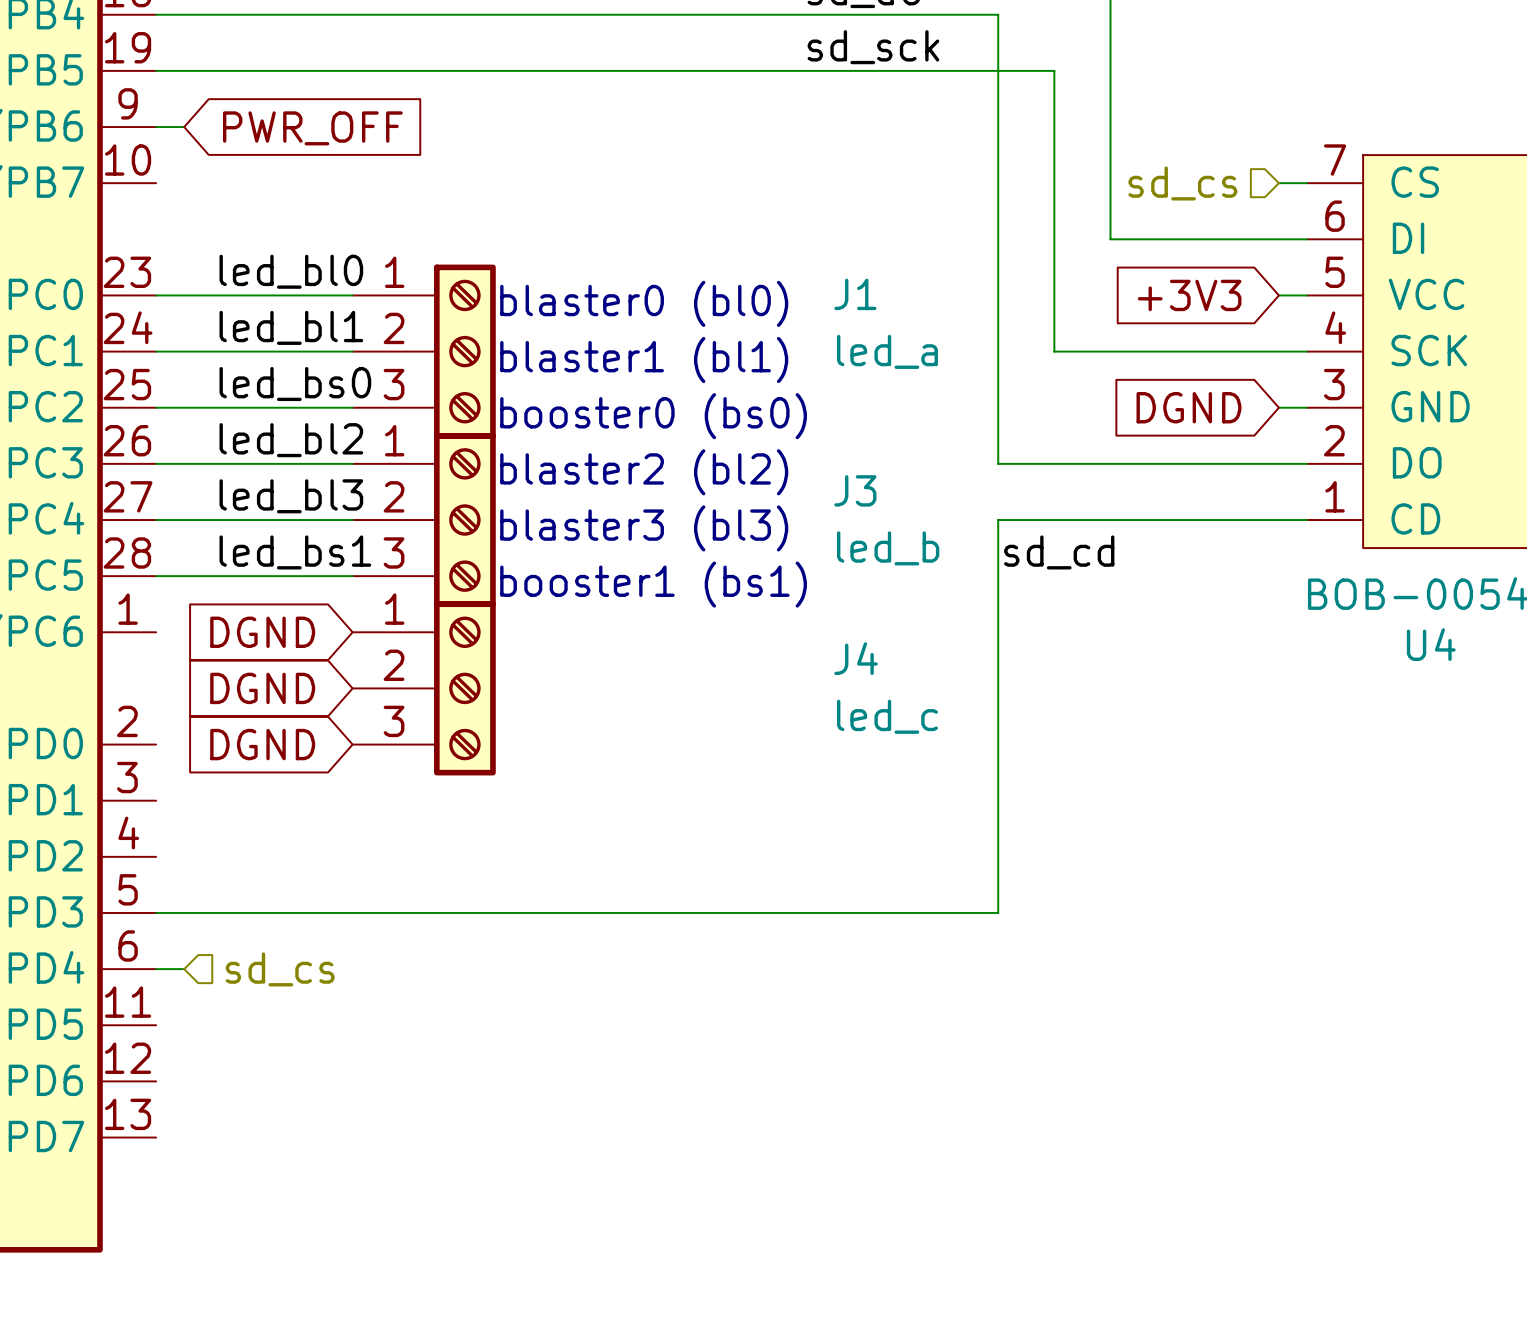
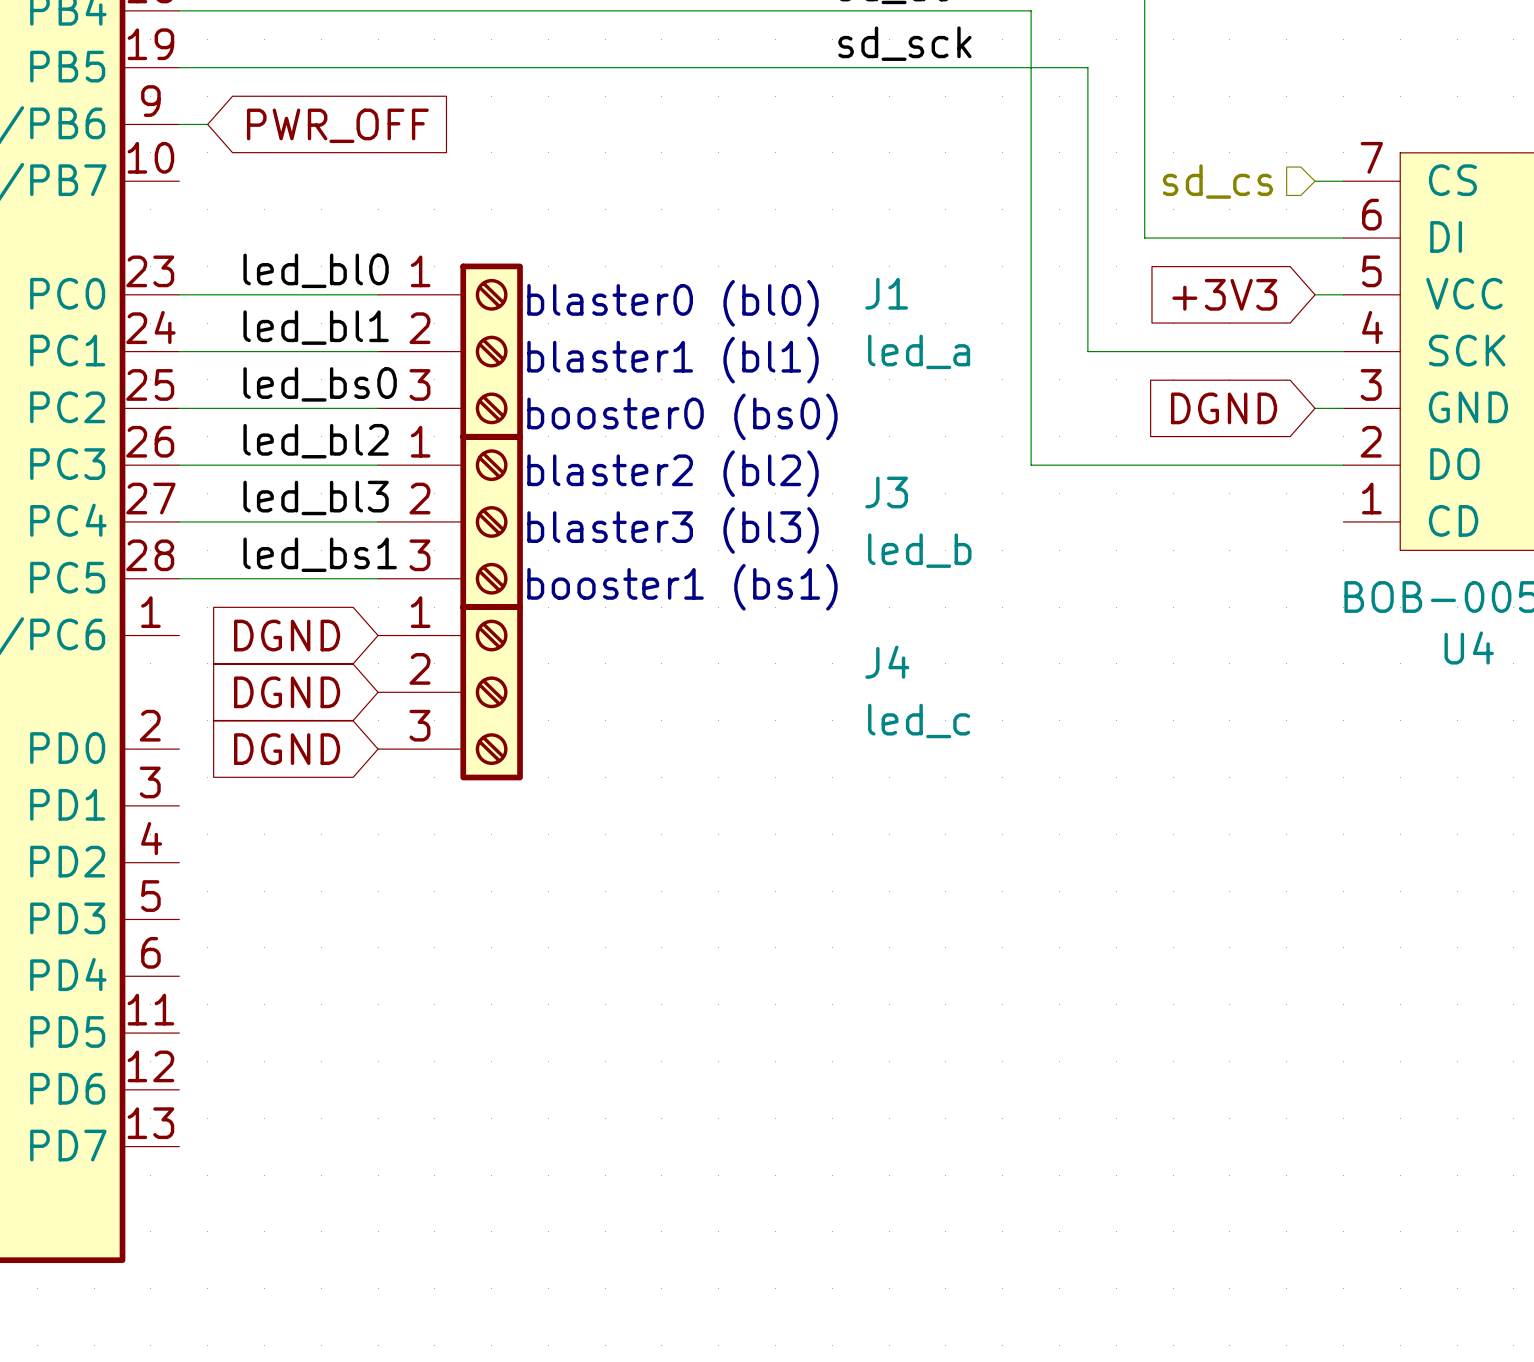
wire: (1306, 520) (998, 520) (998, 912) (156, 912) -> none
label: sd_cd (1059, 552) -> none
wire: (156, 969) (184, 969) -> none
hierarchical label: sd_cs (280, 969) -> none

